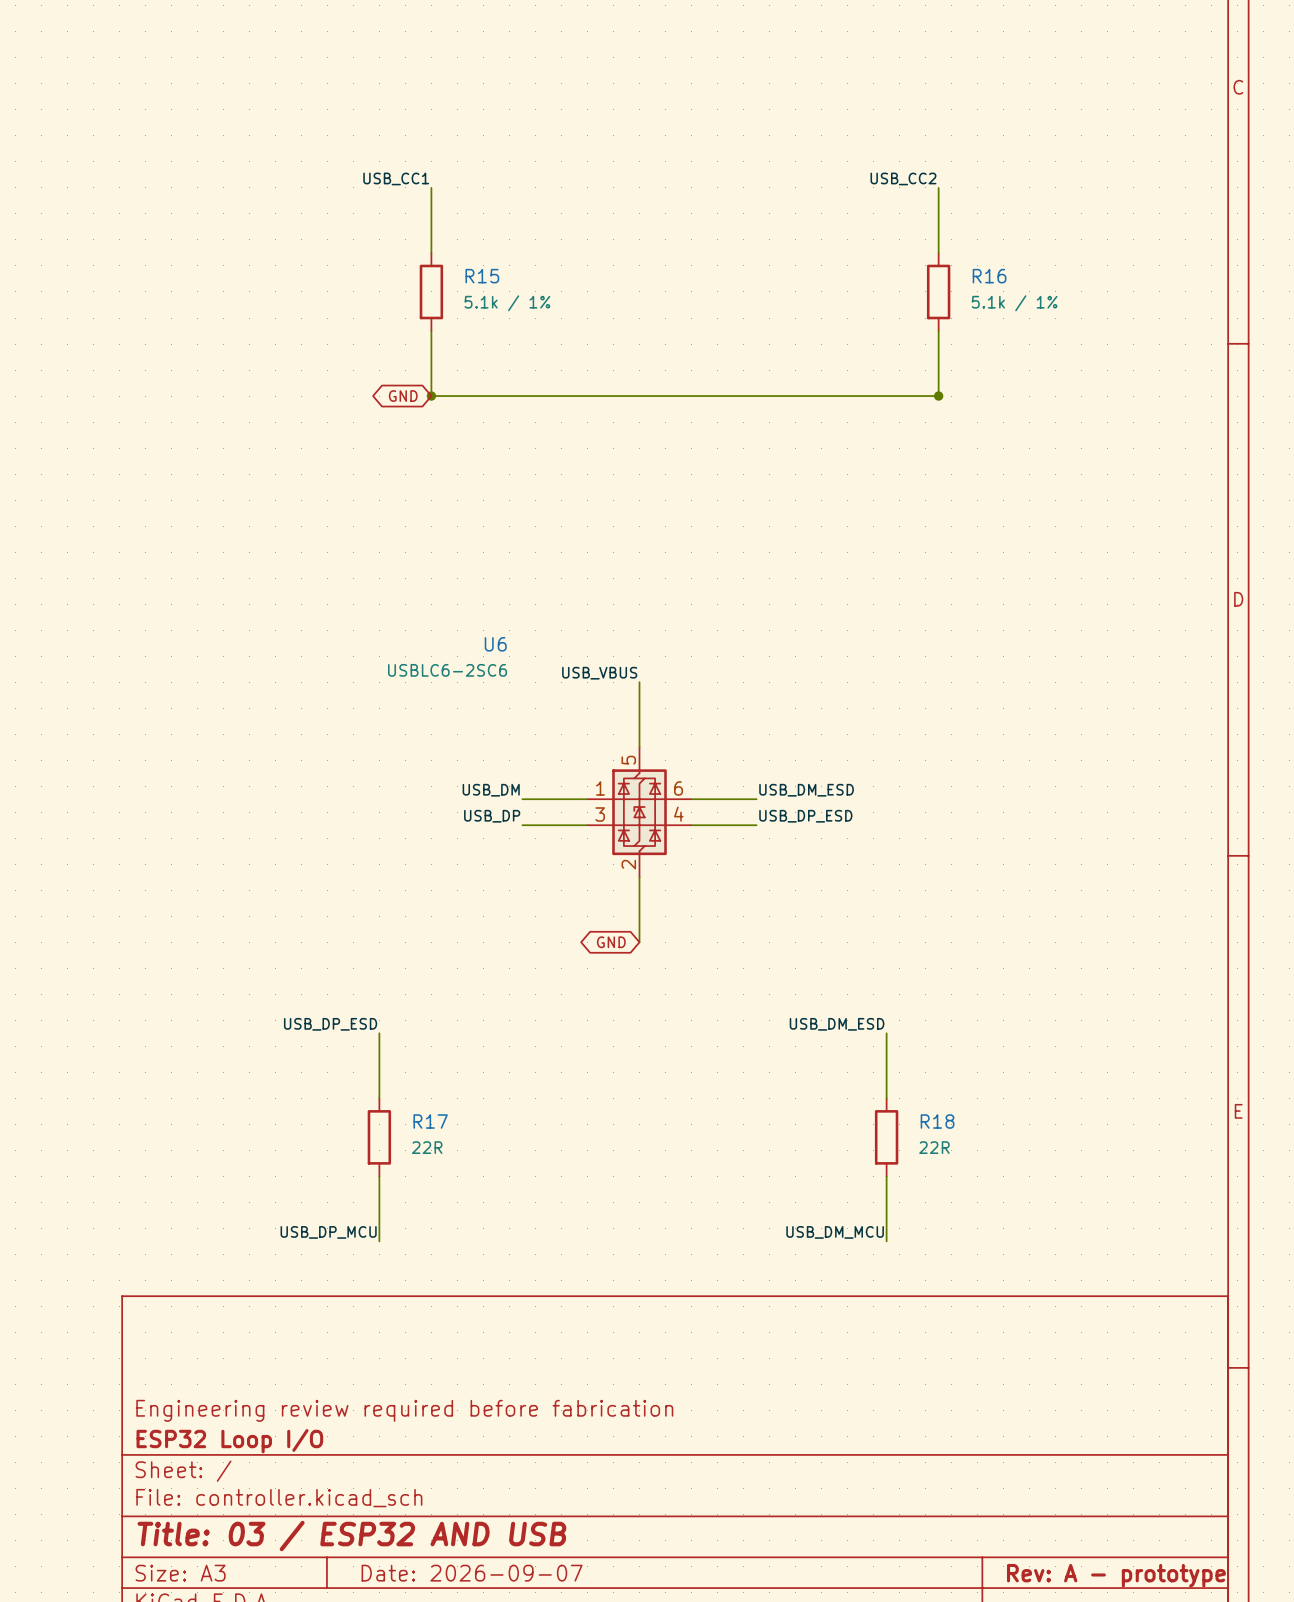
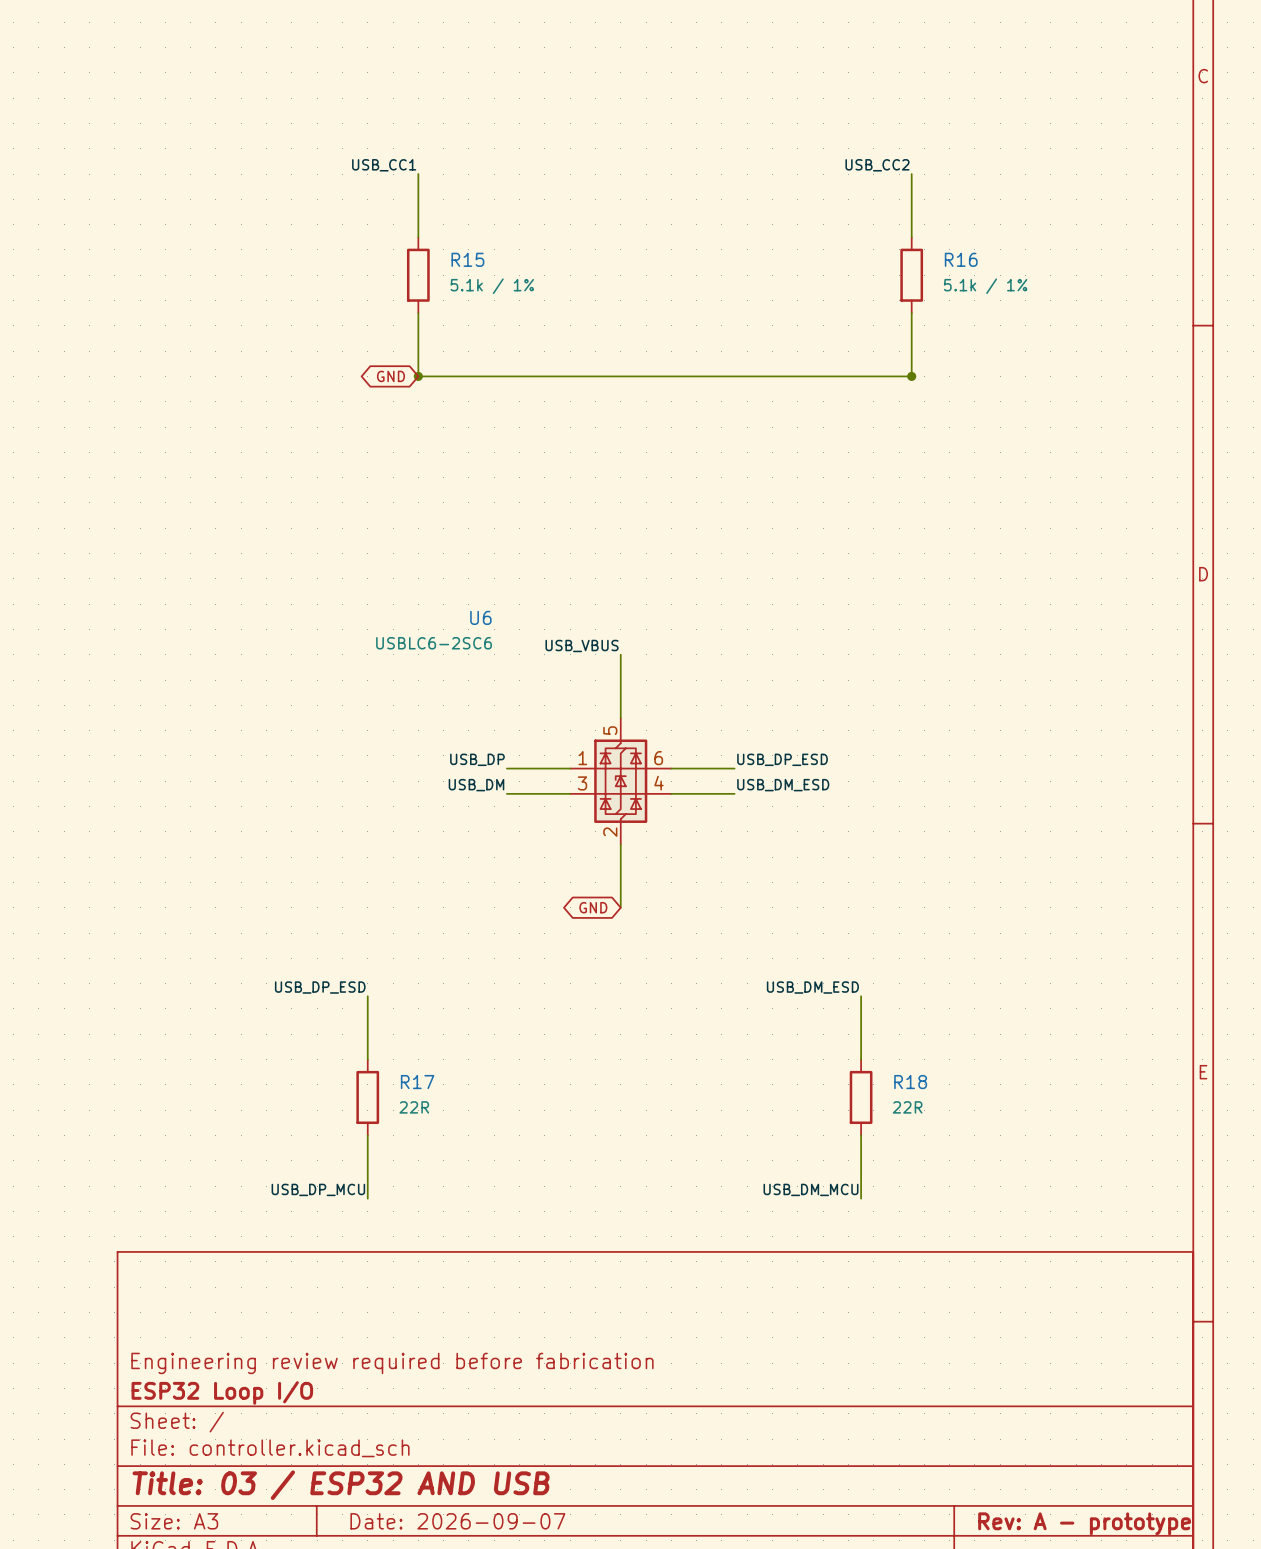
label: USB_DM (491, 790) -> USB_DP (477, 759)
label: USB_DM_ESD (806, 790) -> USB_DP_ESD (782, 759)
label: USB_DP (492, 816) -> USB_DM (476, 785)
label: USB_DP_ESD (805, 816) -> USB_DM_ESD (783, 785)

